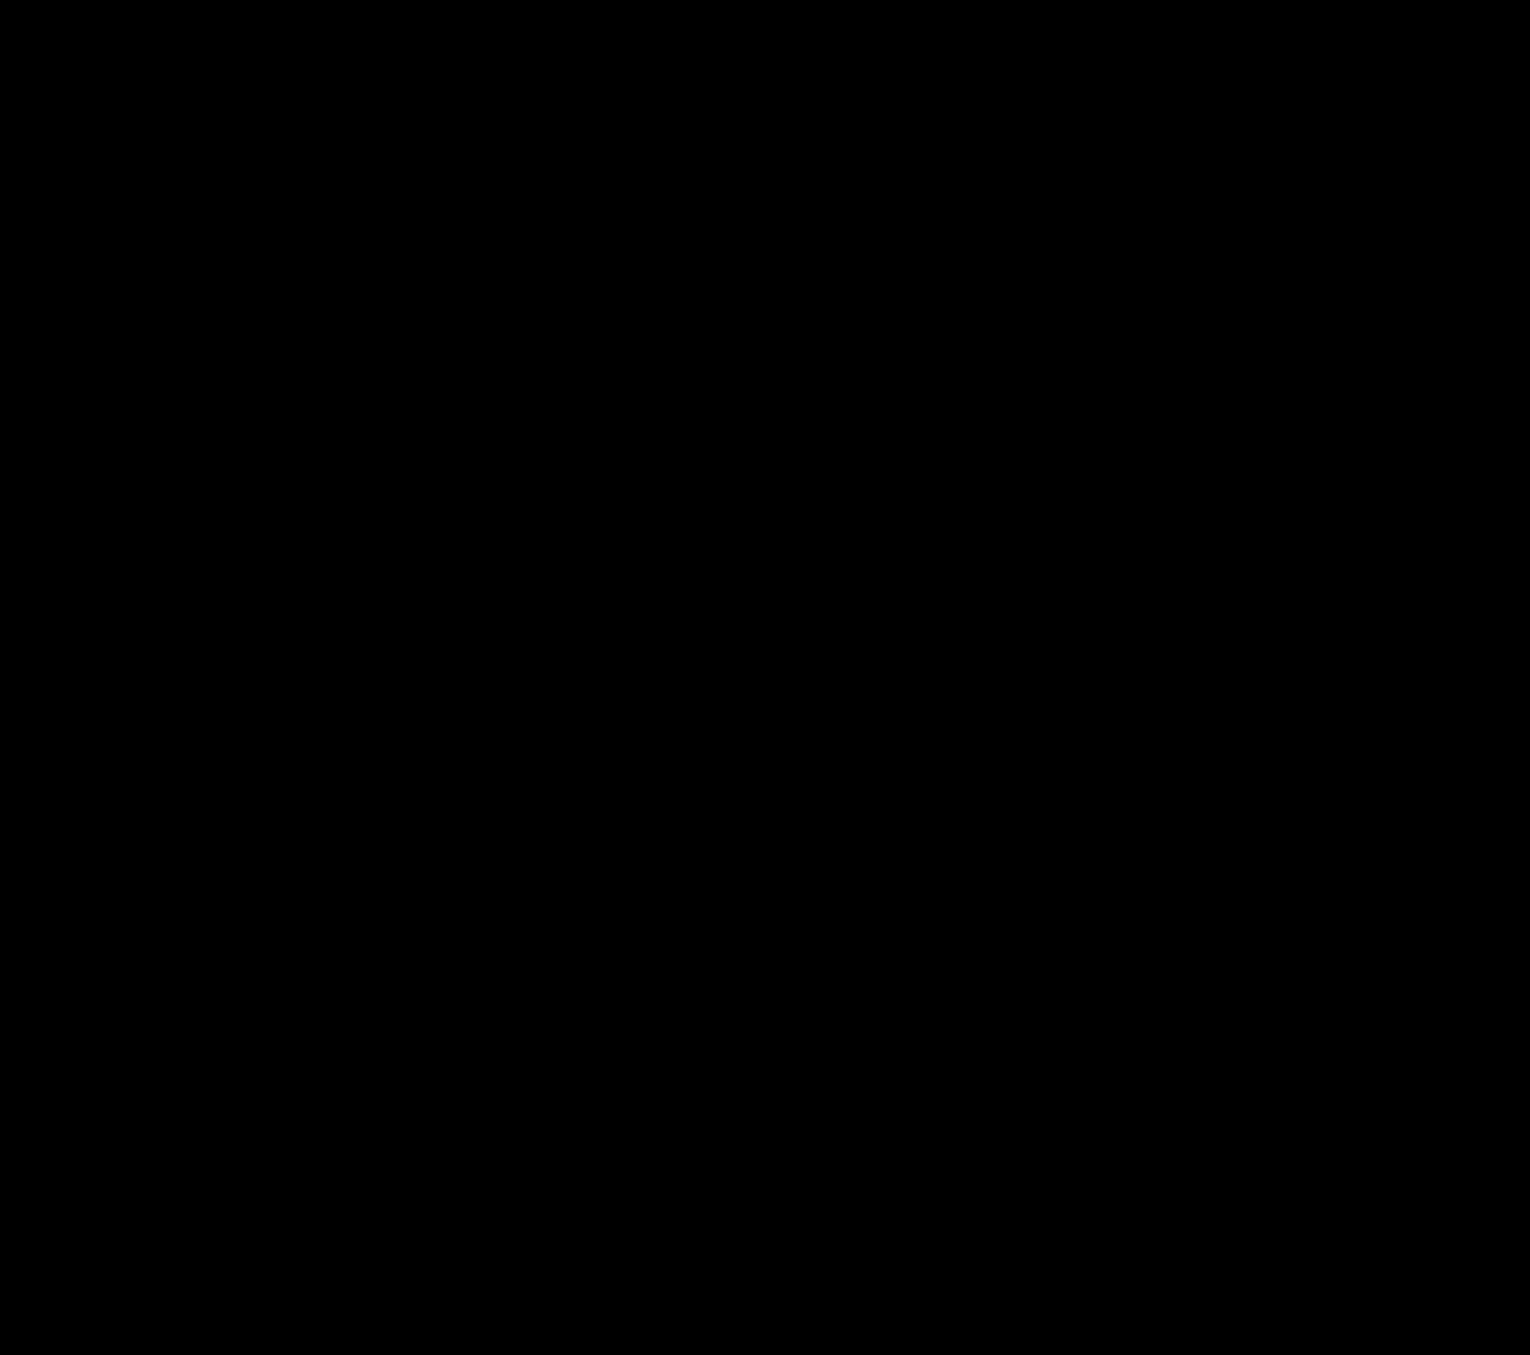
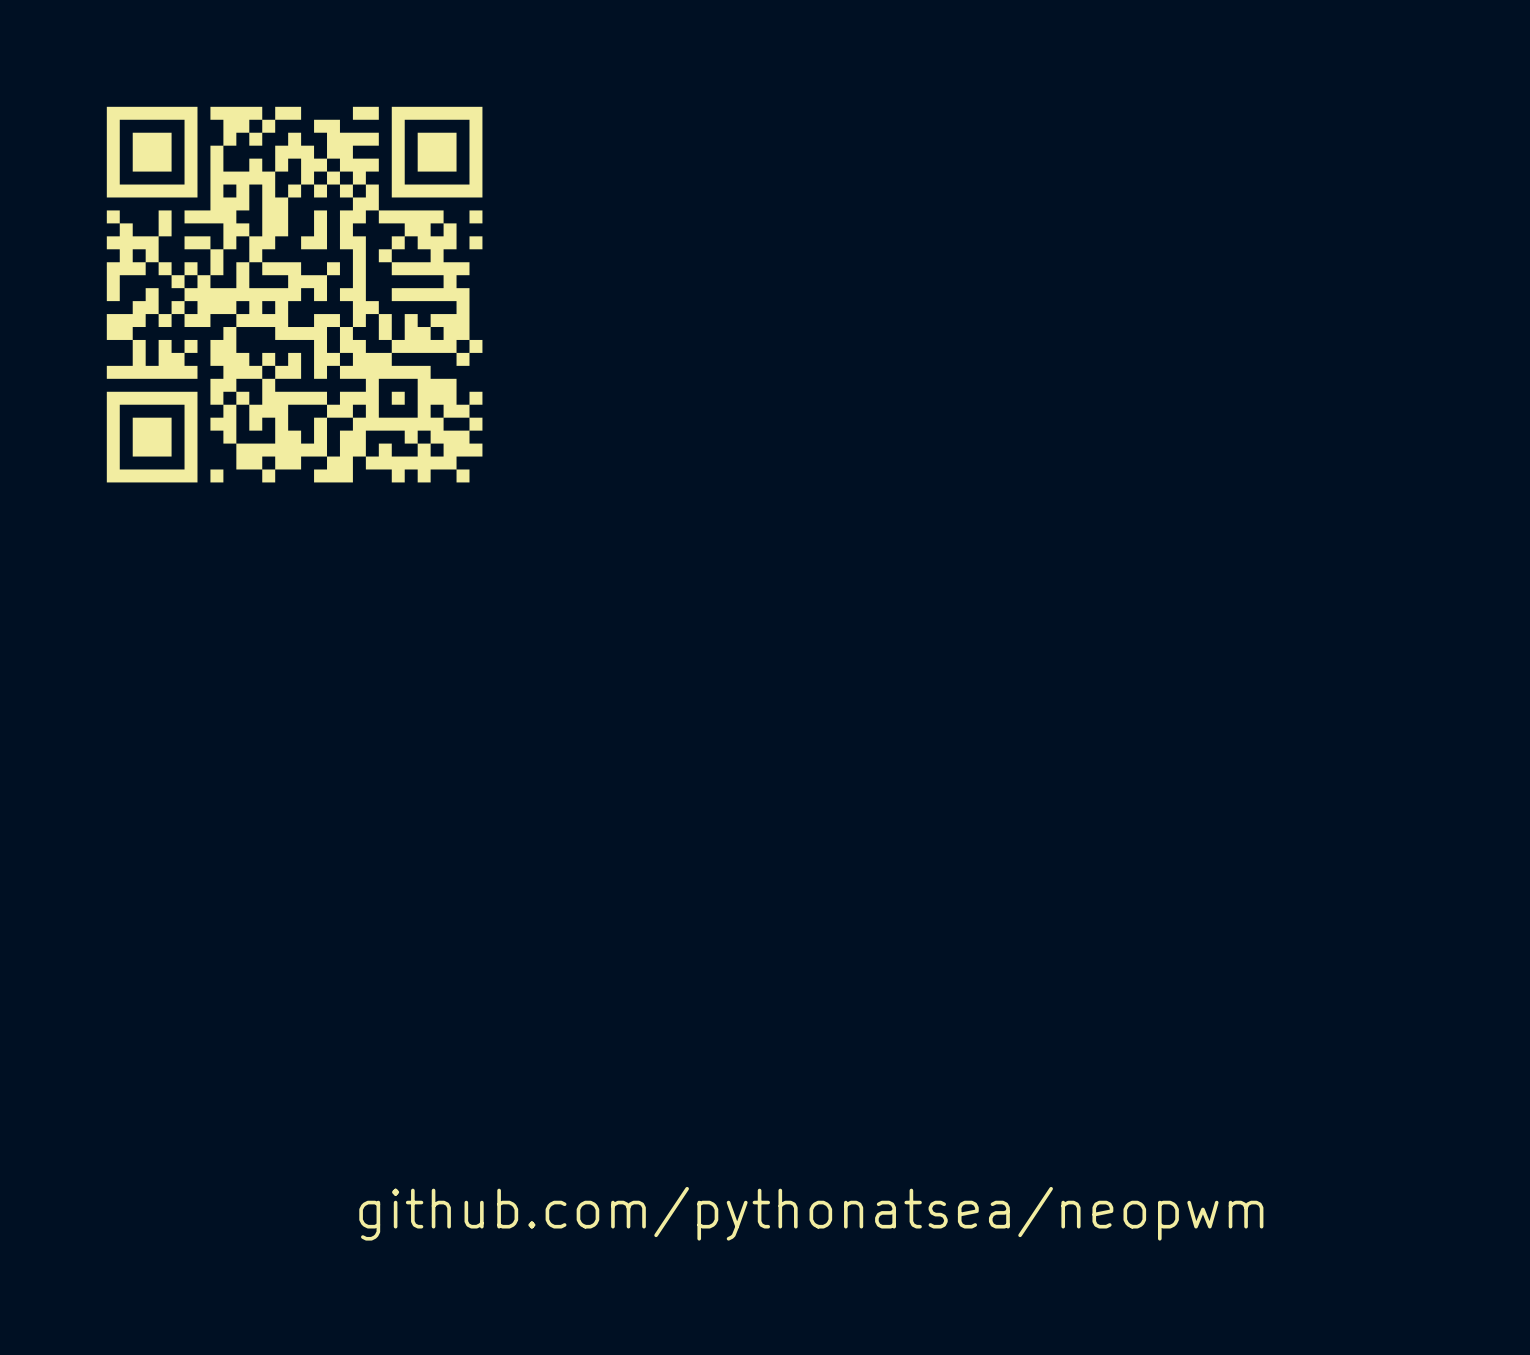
drawing: none -> [106, 106, 483, 483]
text: none -> github.com/pythonatsea/neopwm (811, 1213)

